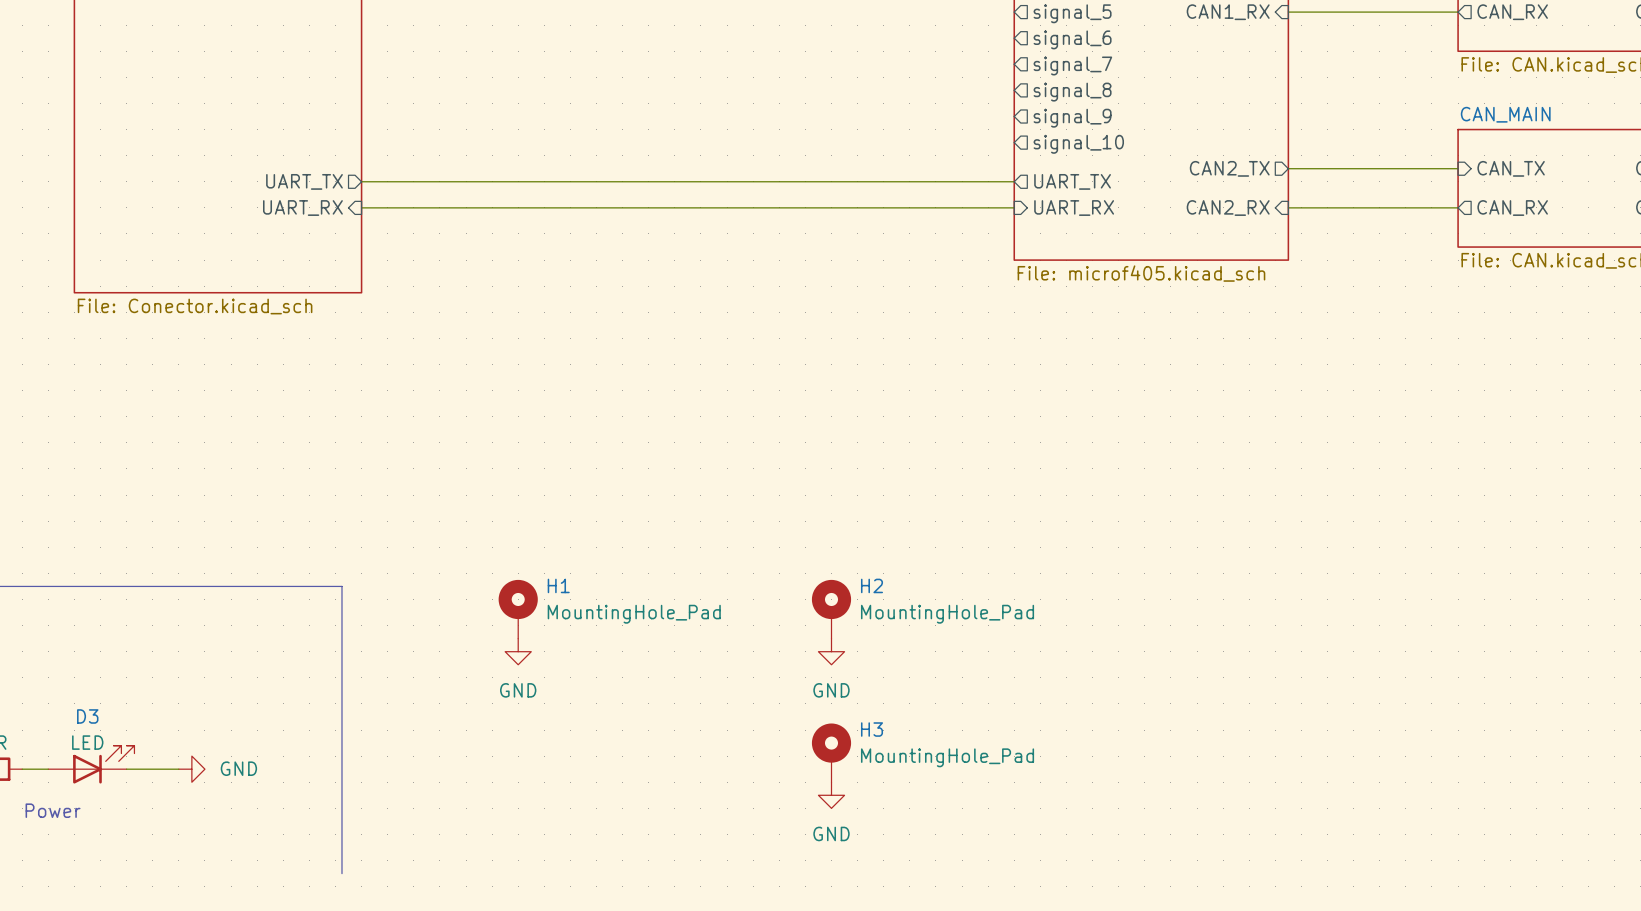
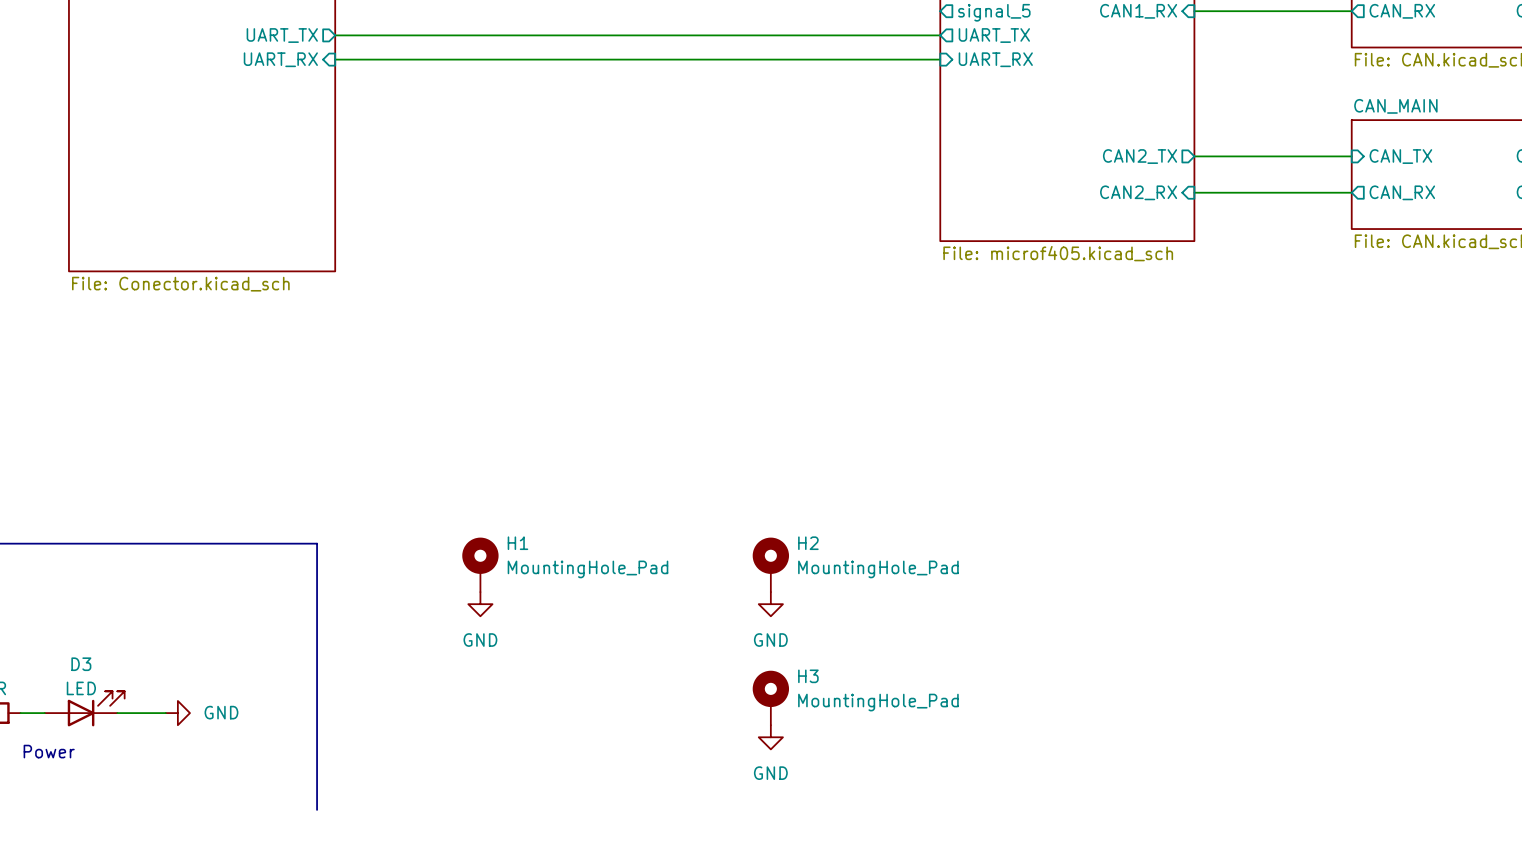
sheet pin: signal_6 (1072, 39) -> UART_TX (994, 35)
sheet pin shape: output (1072, 65) -> input (995, 59)
sheet pin: signal_7 (1072, 65) -> UART_RX (995, 59)
sheet pin: signal_8 (1072, 92) -> none
sheet pin: signal_9 (1072, 118) -> none
sheet pin: signal_10 (1078, 144) -> none
sheet pin position: UART_TX (304, 181) -> UART_TX (282, 35)
wire: (361, 181) (1014, 181) -> (335, 35) (940, 35)
sheet pin: UART_TX (1072, 181) -> none
wire: (361, 207) (1014, 207) -> (335, 59) (940, 59)
sheet pin position: UART_RX (302, 208) -> UART_RX (280, 59)
sheet pin: UART_RX (1074, 208) -> none

